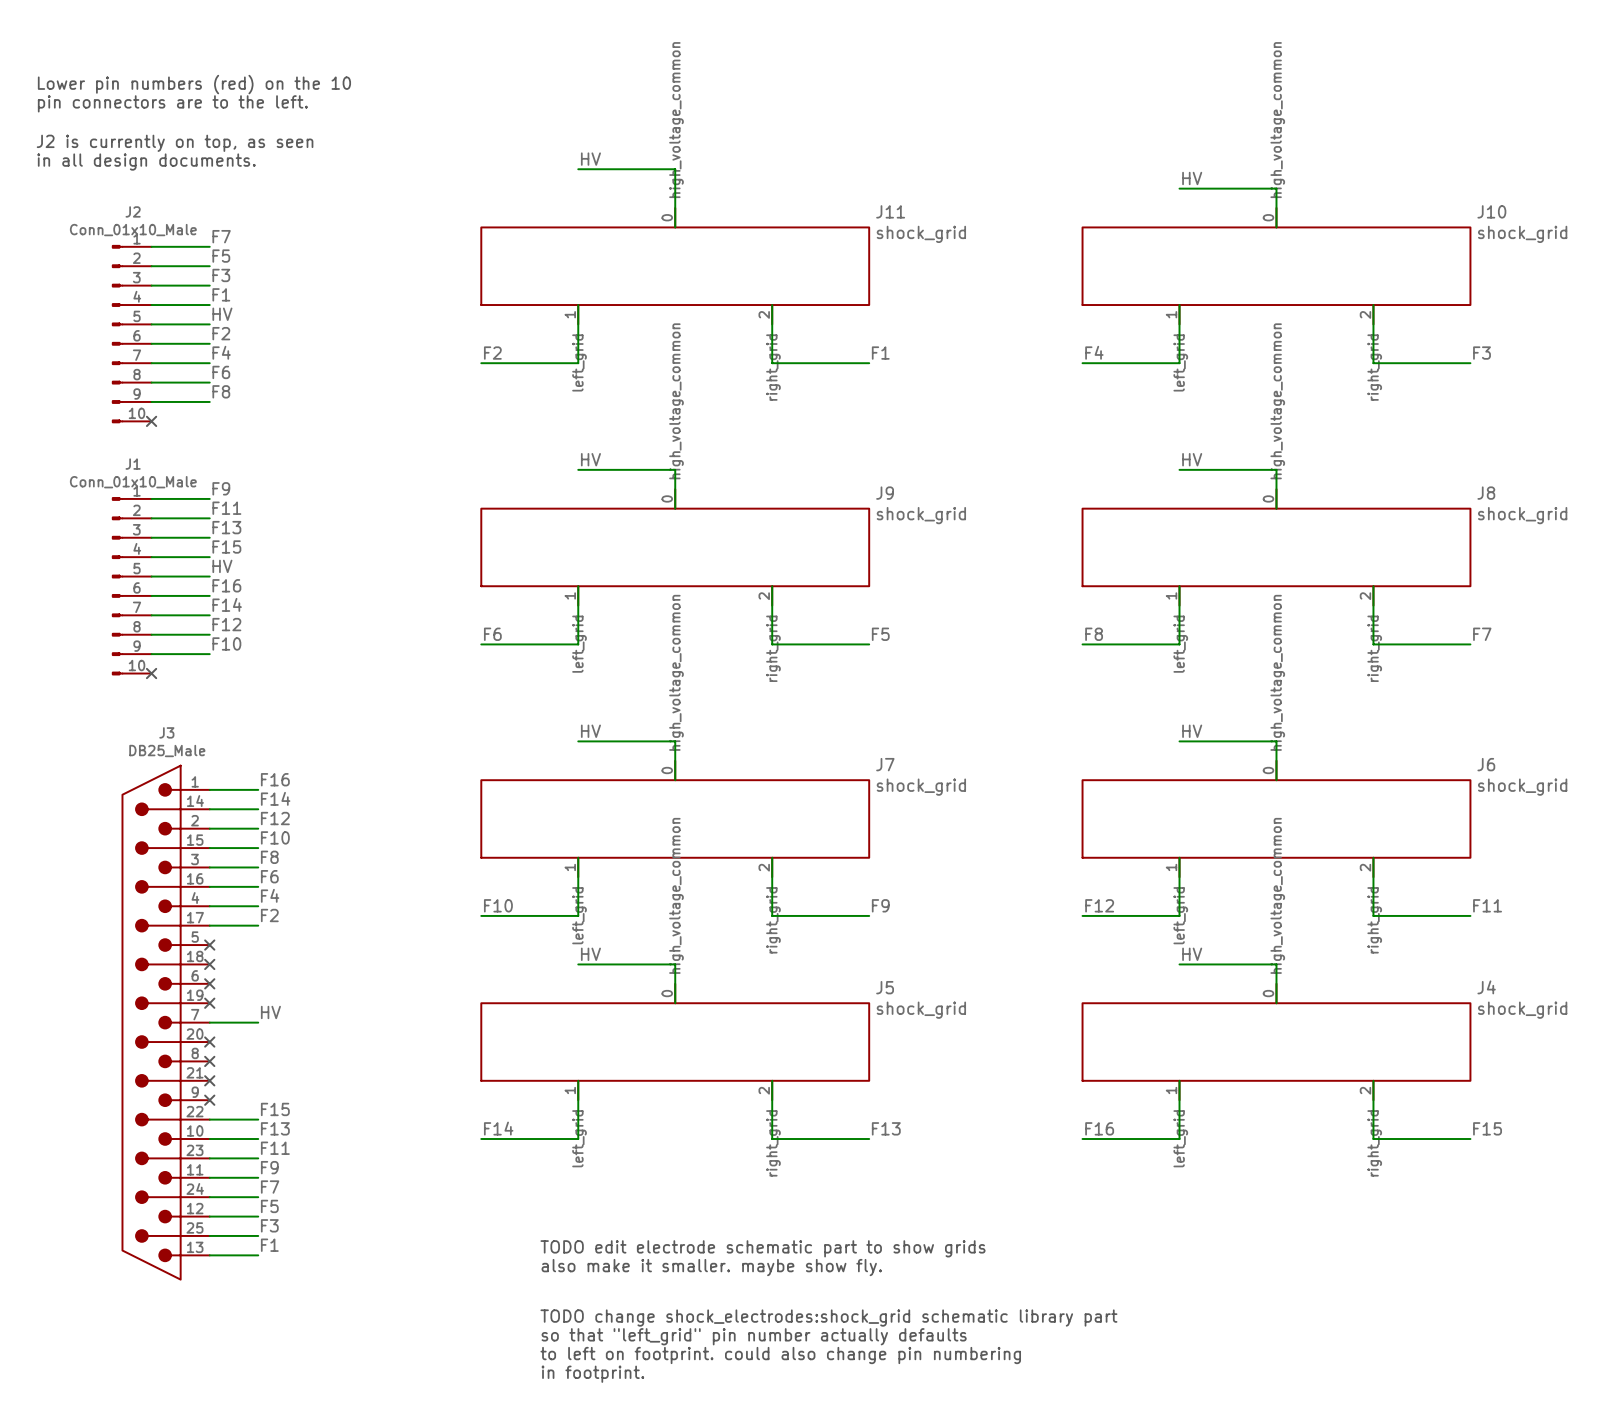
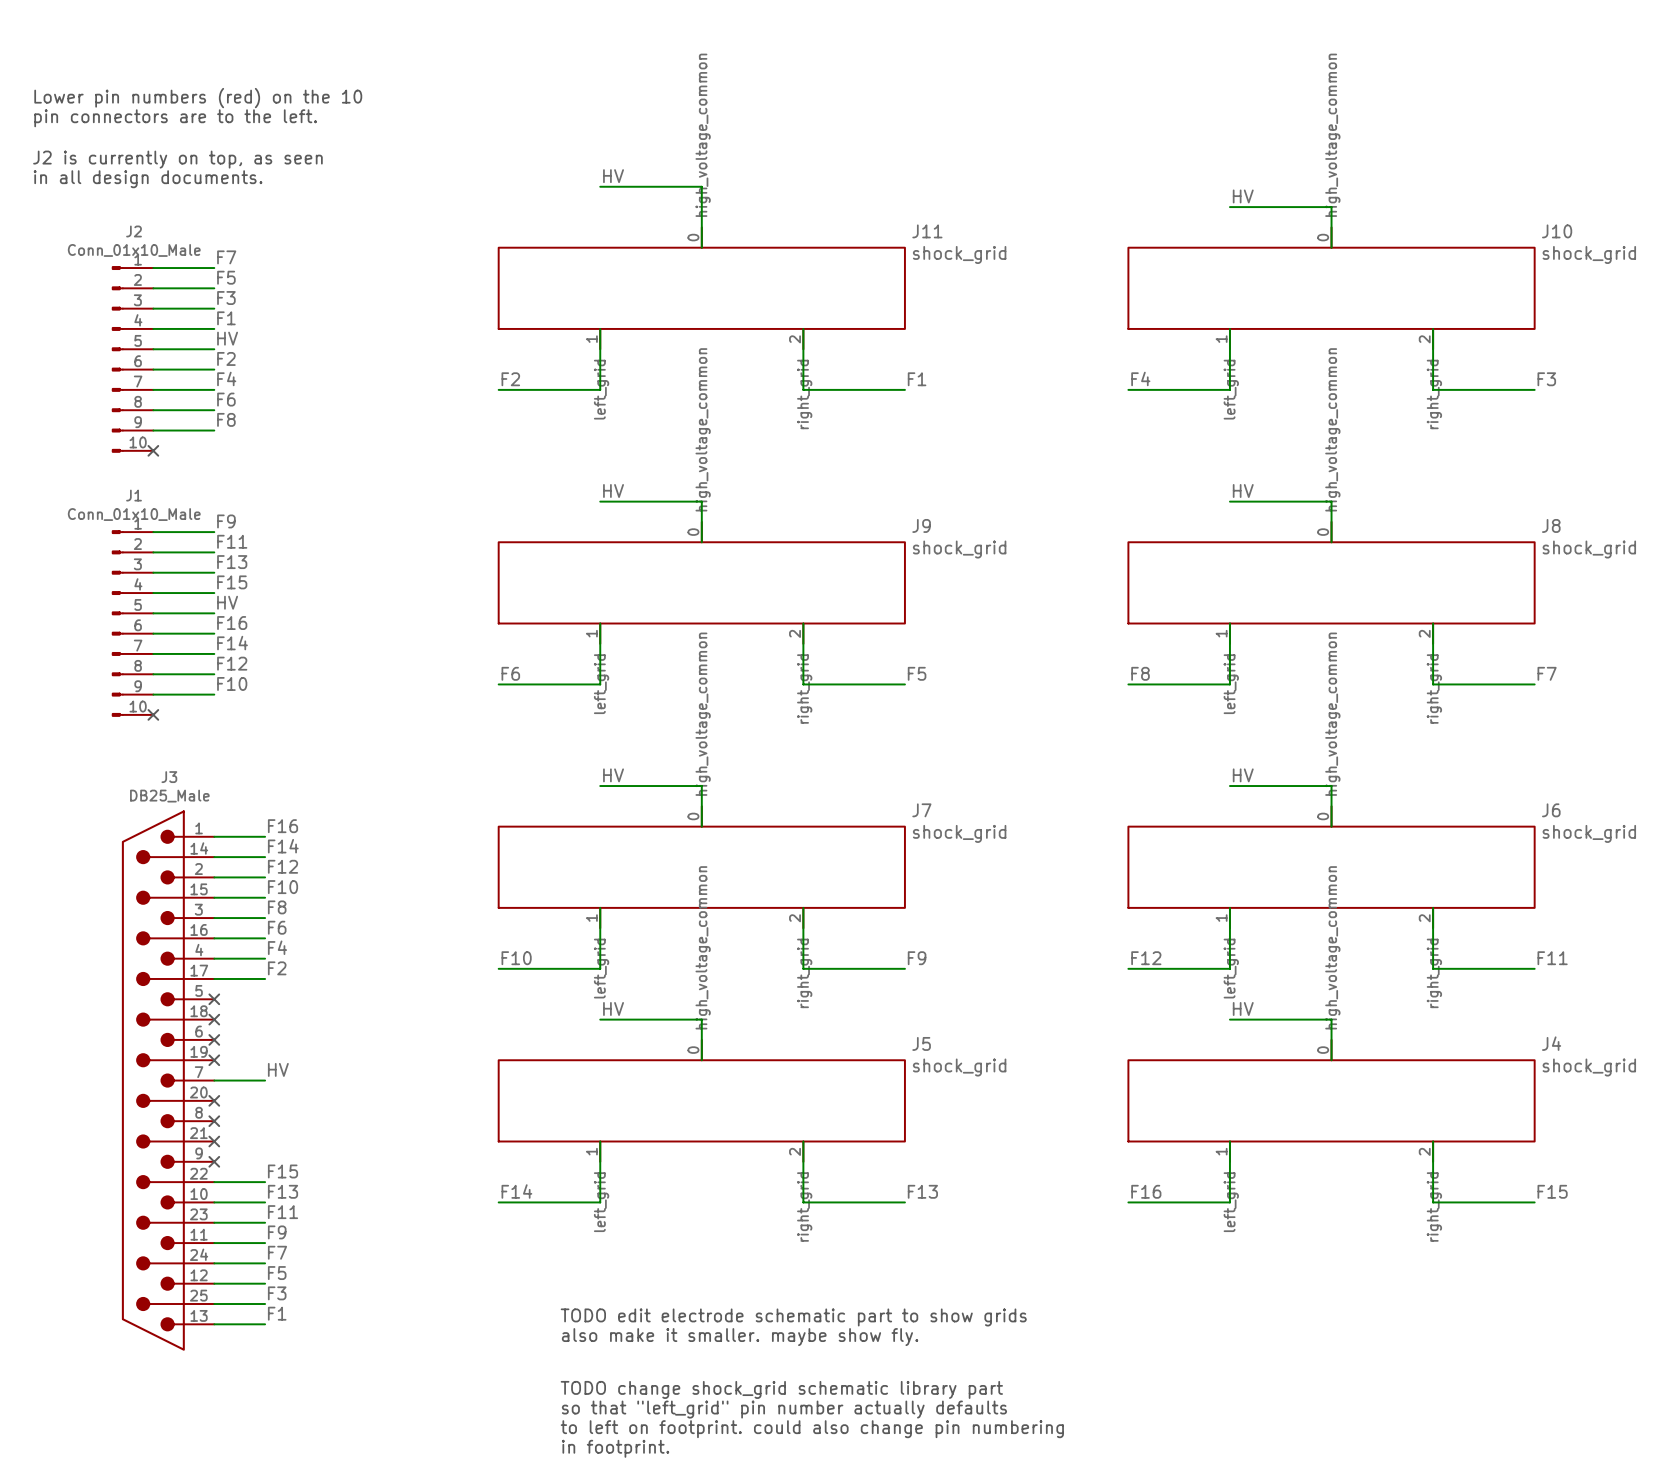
text: TODO change shock_electrodes:shock_grid schematic library part (828, 1318) -> TODO change shock_grid schematic library part (781, 1389)

